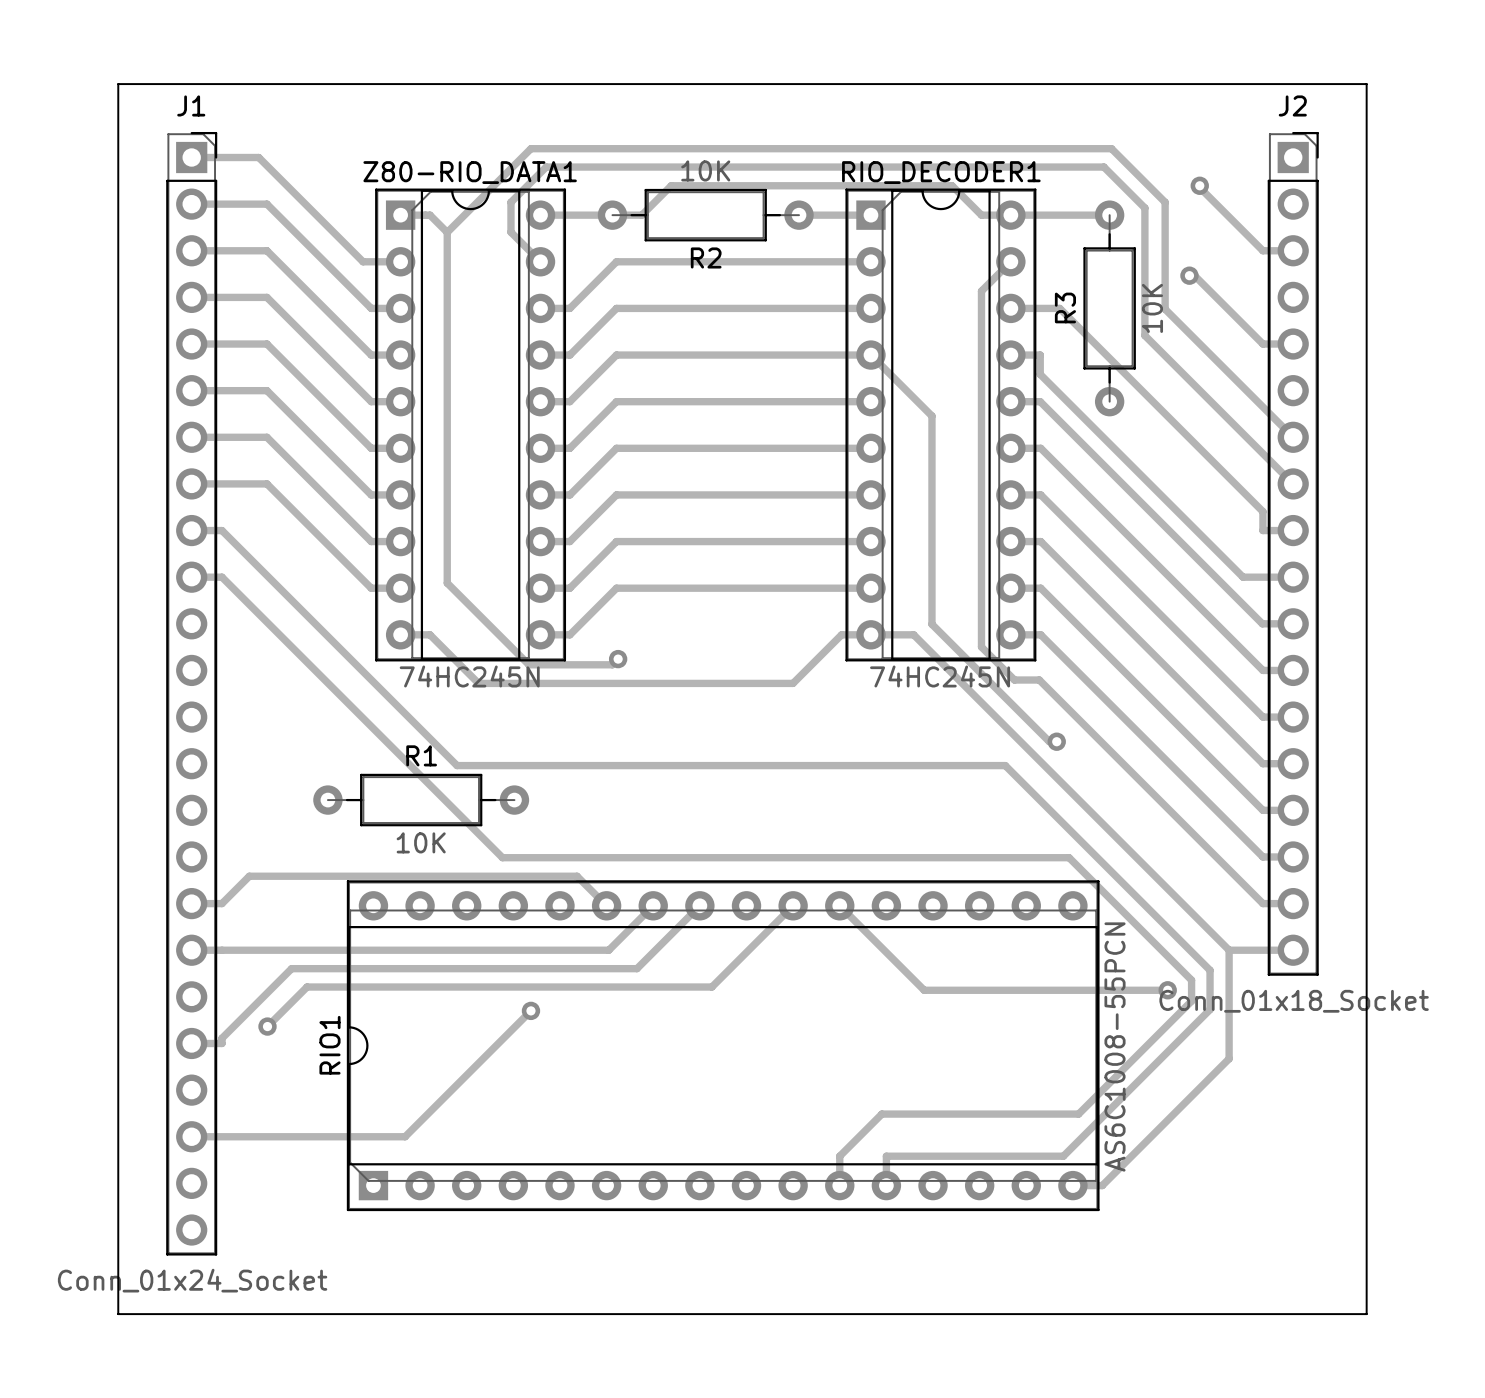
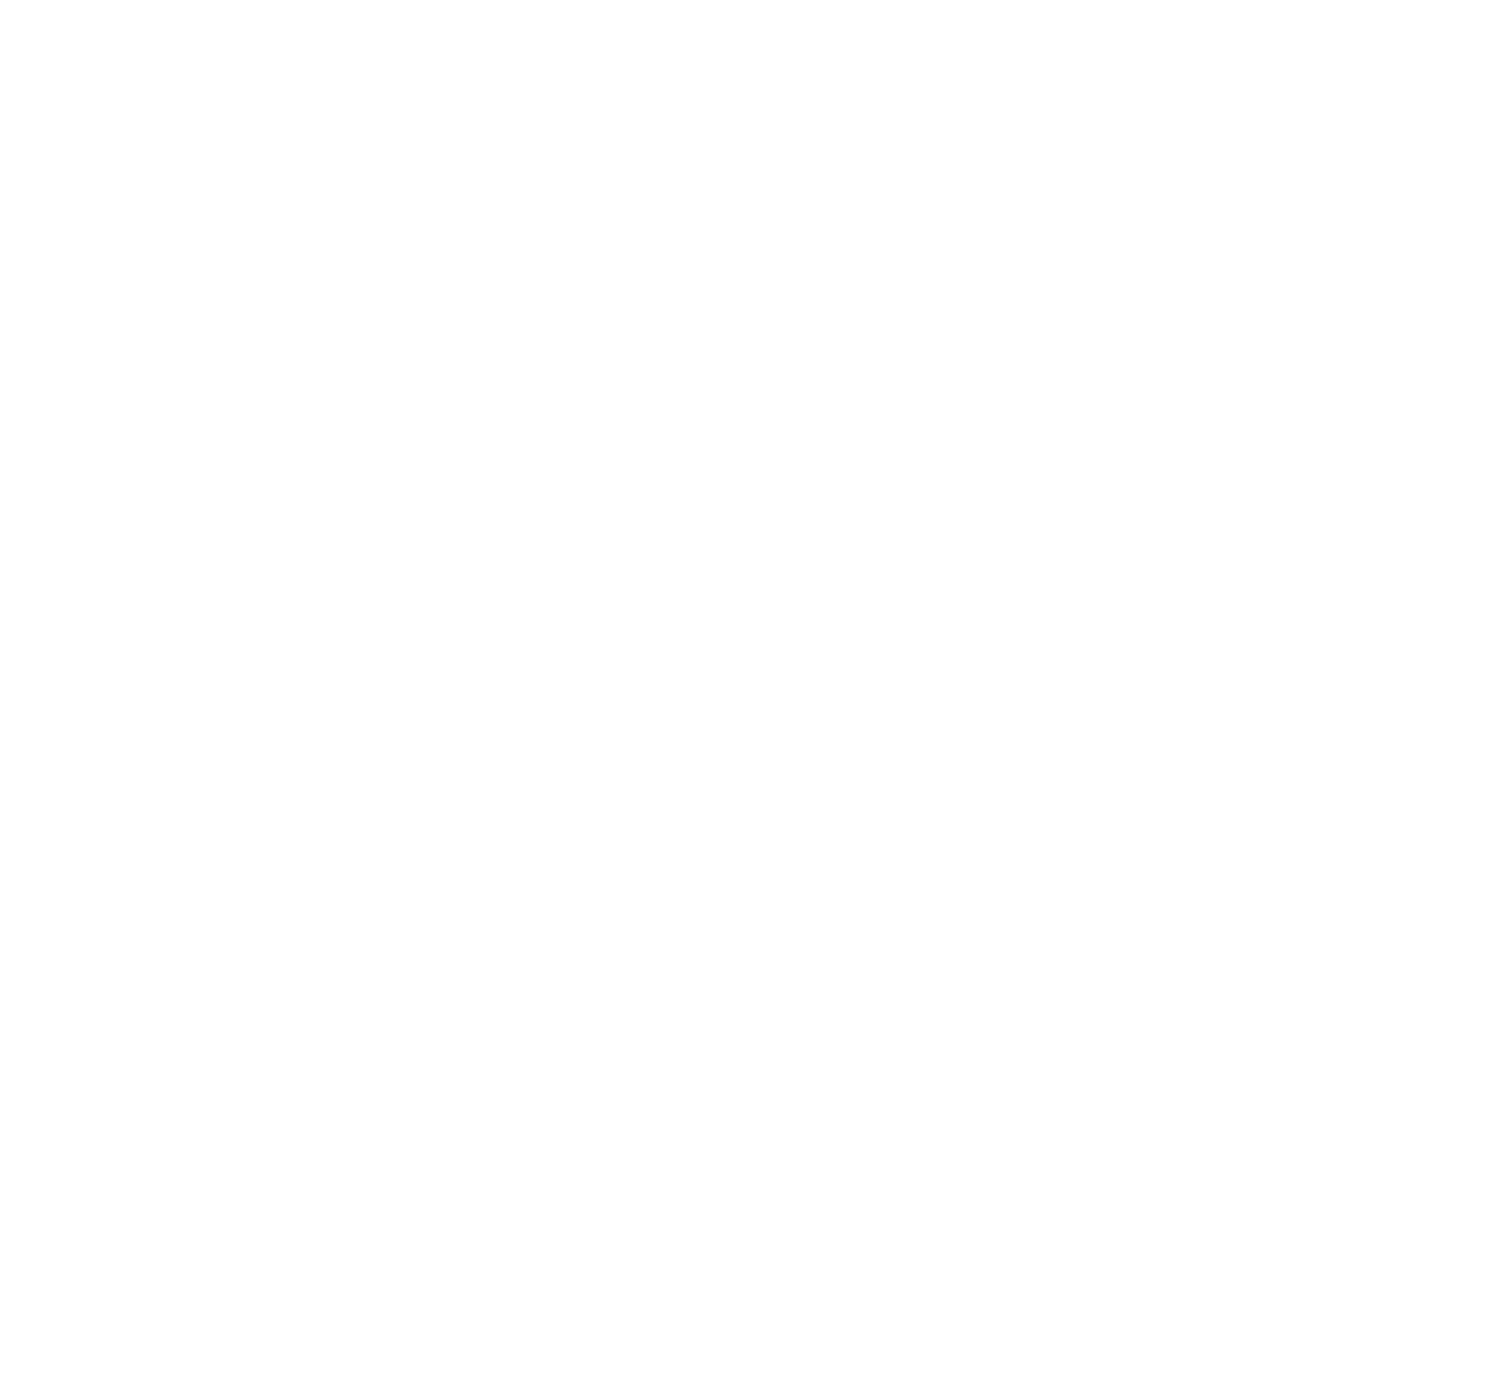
board edge: (118, 84) (1366, 84) (1366, 1314) (118, 1314) (118, 84) -> none
track: (191, 157) (258, 157) (363, 261) (400, 261) -> none
track: (1199, 185) (1262, 250) (1293, 250) -> none
via: (1199, 185) -> none
track: (191, 204) (266, 204) (371, 308) (400, 308) -> none
track: (400, 215) (430, 215) (447, 232) -> none
track: (540, 215) (641, 215) (671, 185) (952, 185) (981, 215) (1109, 215) -> none
R2: 10K (705, 215) -> none
track: (799, 215) (870, 215) -> none
track: (447, 232) (447, 583) (528, 664) (612, 664) (618, 659) -> none
track: (447, 232) (530, 148) (1111, 148) (1165, 202) (1165, 309) (1293, 437) -> none
track: (191, 250) (266, 250) (371, 355) (400, 355) -> none
track: (540, 261) (510, 232) (510, 202) (546, 167) (1103, 167) (1144, 208) (1144, 335) (1293, 483) -> none
track: (870, 261) (616, 261) (569, 308) (540, 308) -> none
track: (1010, 261) (981, 291) (981, 647) (1014, 680) (1039, 680) (1262, 903) (1293, 903) -> none
track: (1189, 275) (1194, 275) (1262, 344) (1293, 344) -> none
via: (1189, 275) -> none
track: (191, 297) (266, 297) (371, 401) (400, 401) -> none
track: (870, 308) (616, 308) (569, 355) (540, 355) -> none
track: (1010, 308) (1059, 308) (1262, 511) (1262, 530) (1293, 530) -> none
R3: 10K (1109, 308) -> none
track: (191, 344) (266, 344) (371, 448) (400, 448) -> none
track: (1010, 355) (1040, 355) (1040, 374) (1243, 577) (1293, 577) -> none
track: (191, 390) (266, 390) (371, 494) (400, 494) -> none
track: (540, 401) (569, 401) (616, 355) (870, 355) (931, 416) (931, 624) (1049, 741) (1056, 741) -> none
track: (870, 401) (616, 401) (569, 448) (540, 448) -> none
track: (1010, 401) (1040, 401) (1262, 623) (1293, 623) -> none
Z80-RIO_DATA1: 74HC245N (470, 424) -> none
RIO_DECODER1: 74HC245N (940, 424) -> none
track: (191, 437) (266, 437) (371, 541) (400, 541) -> none
track: (870, 448) (616, 448) (569, 494) (540, 494) -> none
track: (1010, 448) (1040, 448) (1262, 670) (1293, 670) -> none
track: (191, 483) (266, 483) (371, 588) (400, 588) -> none
track: (870, 494) (616, 494) (569, 541) (540, 541) -> none
track: (1010, 494) (1040, 494) (1262, 717) (1293, 717) -> none
track: (191, 530) (222, 530) (457, 765) (1005, 765) (1210, 970) (1210, 1009) (1063, 1156) (886, 1156) (886, 1185) -> none
track: (870, 541) (616, 541) (569, 588) (540, 588) -> none
track: (1010, 541) (1040, 541) (1262, 763) (1293, 763) -> none
J2: Conn_01x18_Socket (1293, 553) -> none
track: (191, 577) (222, 577) (502, 857) (1069, 857) (1191, 980) (1191, 1001) (1078, 1114) (881, 1114) (839, 1156) (839, 1185) -> none
track: (870, 588) (616, 588) (569, 634) (540, 634) -> none
track: (1010, 588) (1040, 588) (1262, 810) (1293, 810) -> none
track: (400, 634) (430, 634) (478, 683) (793, 683) (841, 634) (913, 634) (1229, 950) -> none
track: (1010, 634) (1040, 634) (1262, 856) (1293, 856) -> none
via: (618, 659) -> none
J1: Conn_01x24_Socket (191, 693) -> none
via: (1056, 741) -> none
R1: 10K (421, 800) -> none
track: (191, 903) (222, 903) (249, 876) (577, 876) (606, 905) -> none
track: (653, 905) (608, 950) (191, 950) -> none
track: (699, 905) (637, 968) (291, 968) (222, 1038) (222, 1043) (191, 1043) -> none
track: (793, 905) (711, 987) (307, 987) (267, 1026) -> none
track: (839, 905) (924, 990) (1167, 990) -> none
track: (1229, 950) (1293, 950) -> none
track: (1229, 950) (1229, 1058) (1102, 1185) (1072, 1185) -> none
via: (1167, 990) -> none
track: (530, 1010) (405, 1136) (191, 1136) -> none
via: (530, 1010) -> none
via: (267, 1026) -> none
RIO1: AS6C1008-55PCN (723, 1045) -> none

